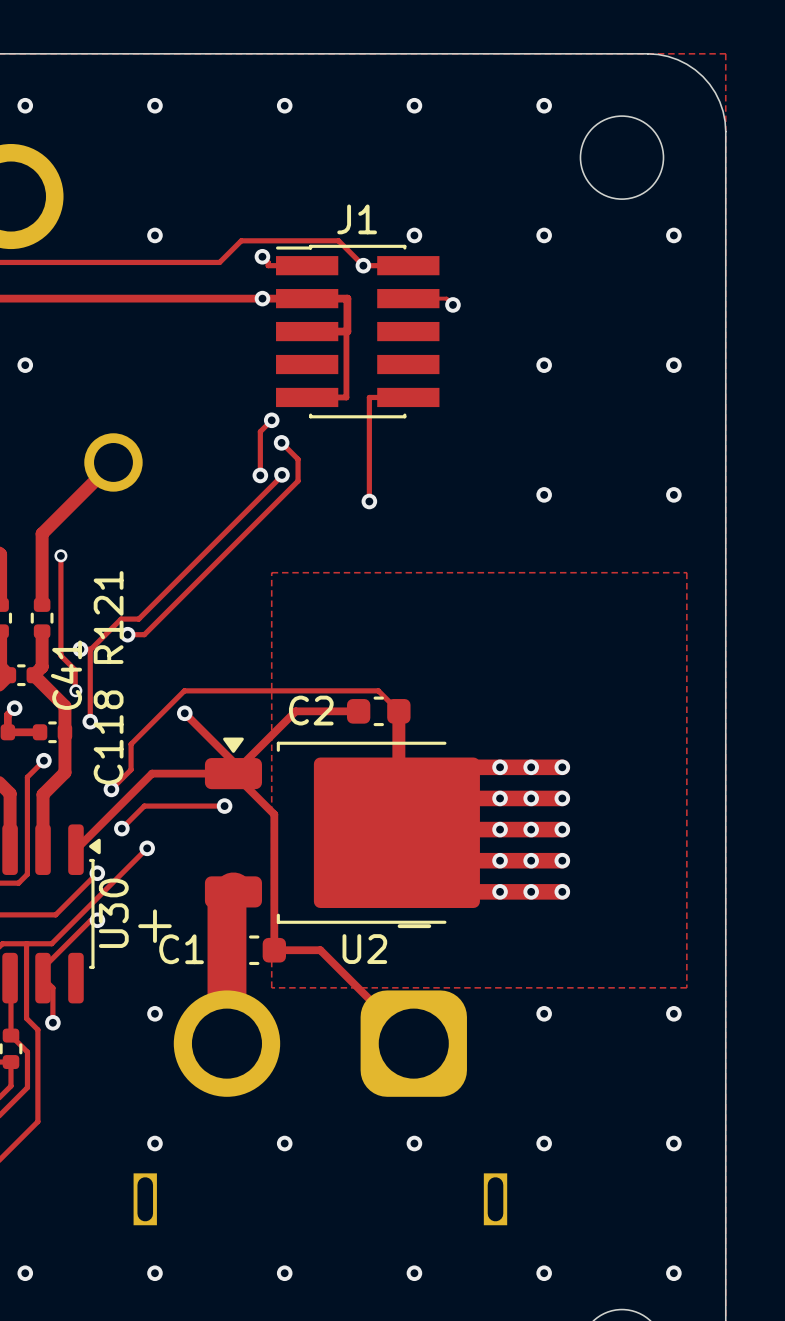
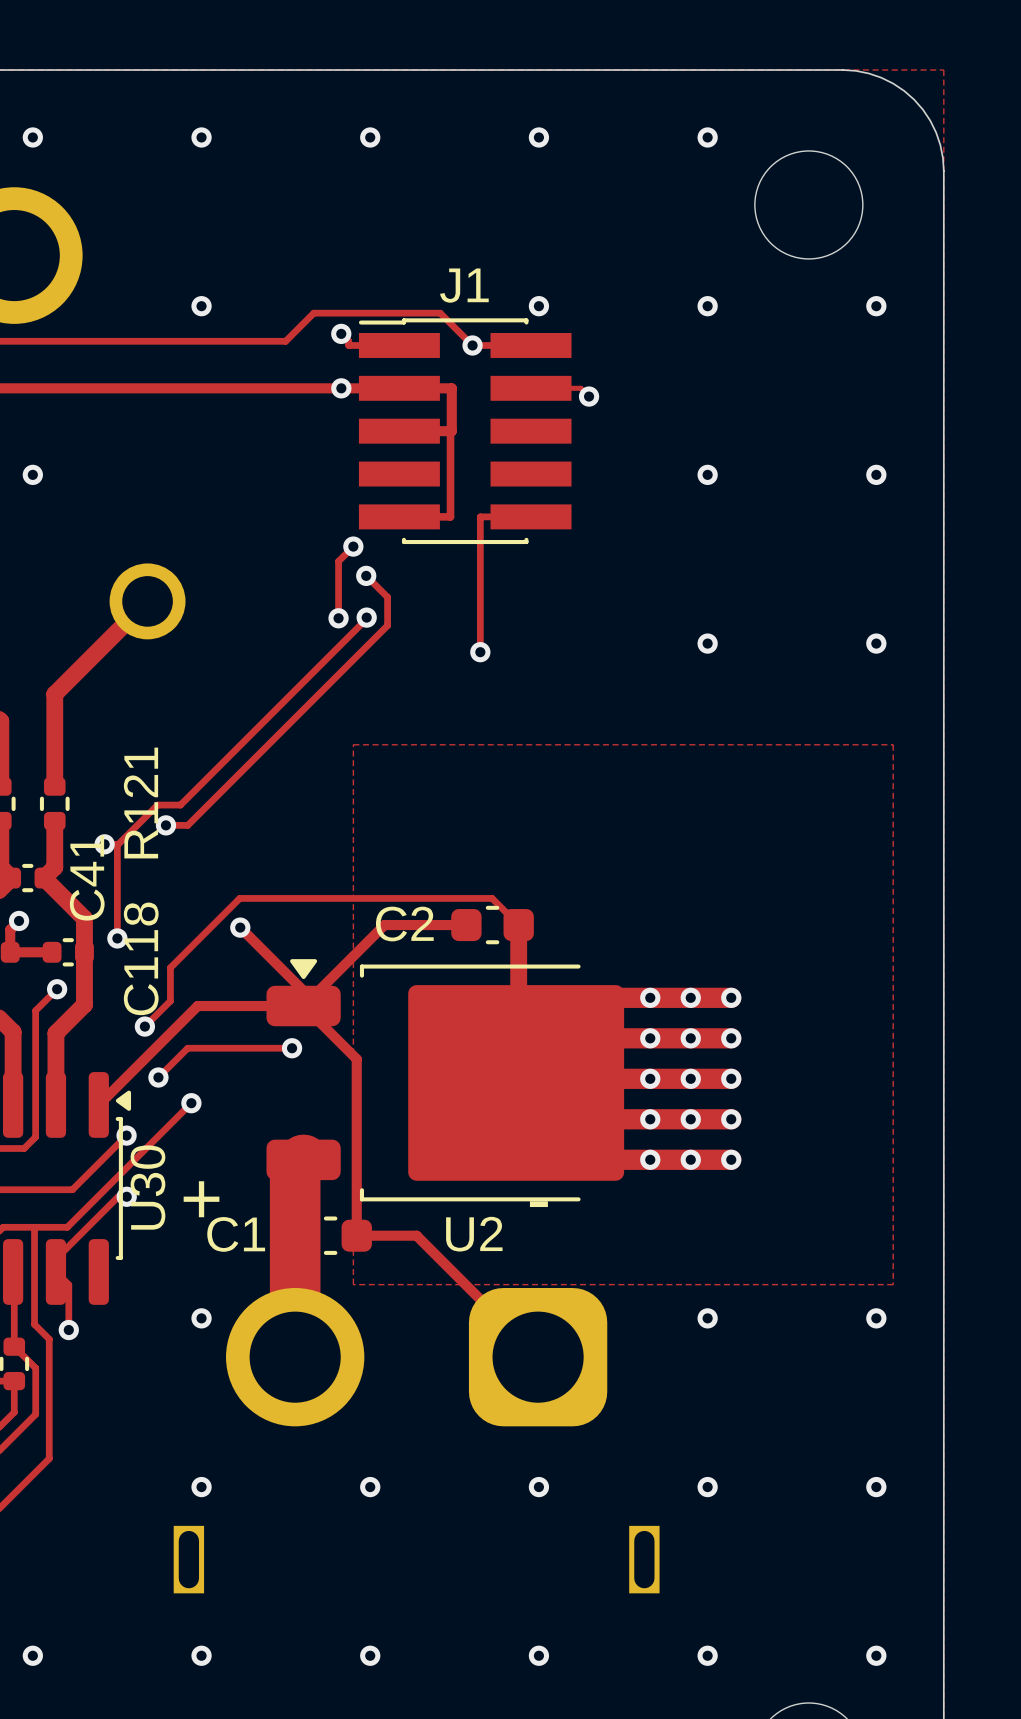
track: (60, 555) (60, 655) (75, 670) (75, 690) -> none
via: (60, 555) -> none
via: (75, 690) -> none

